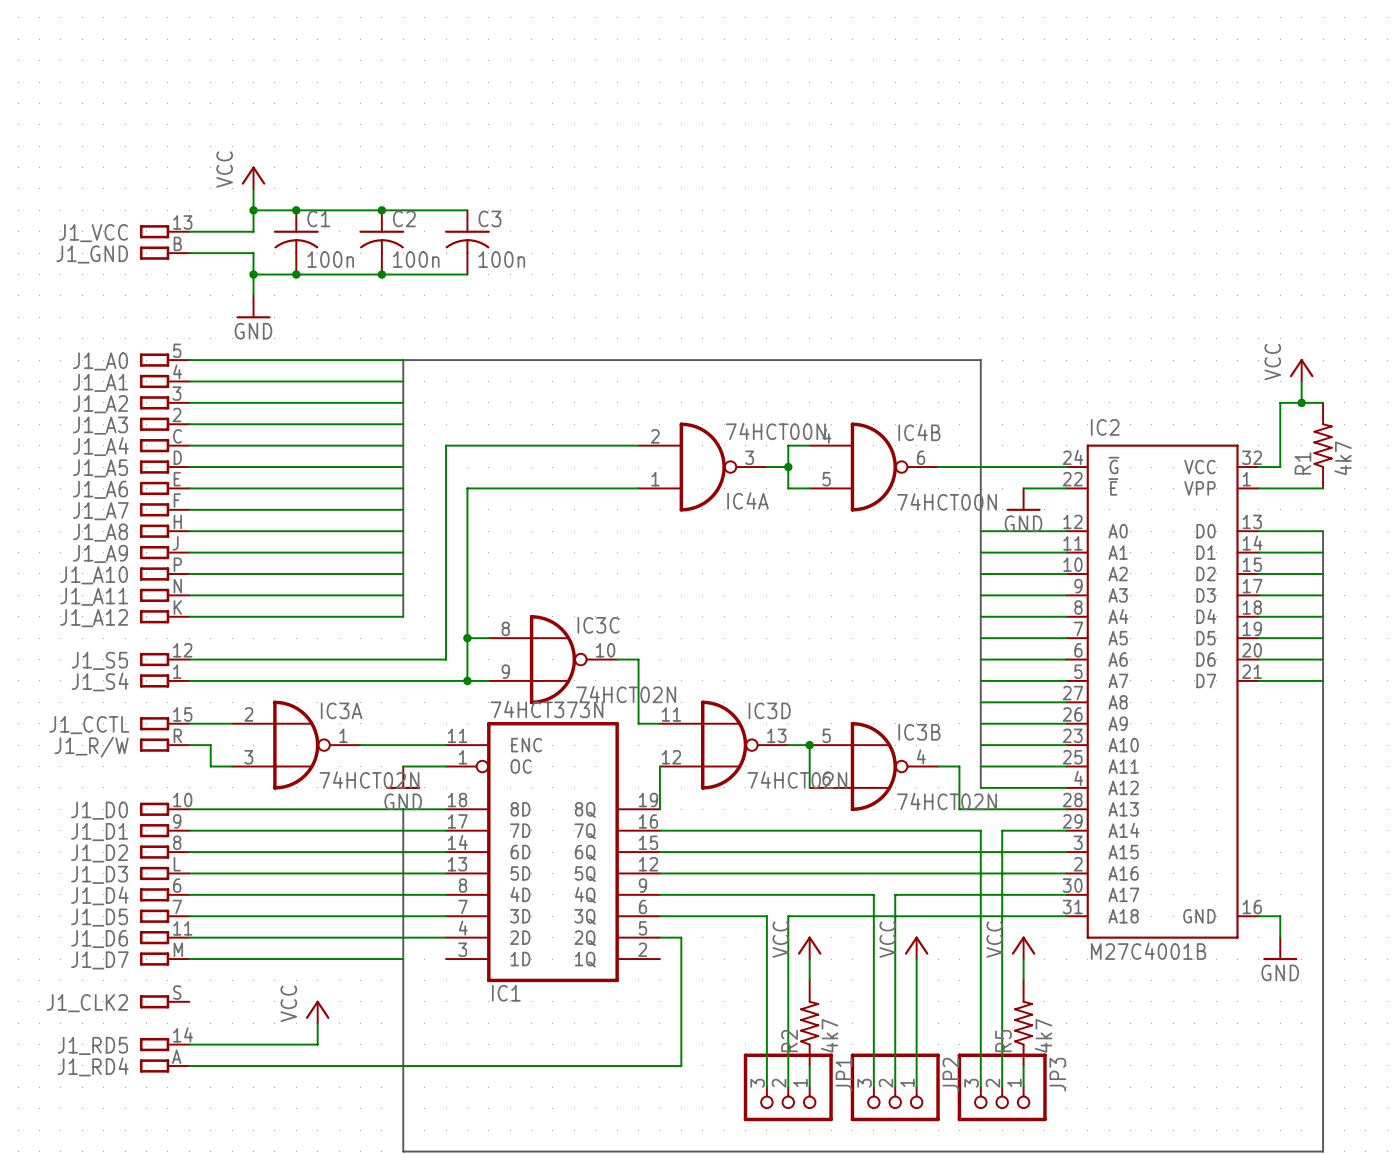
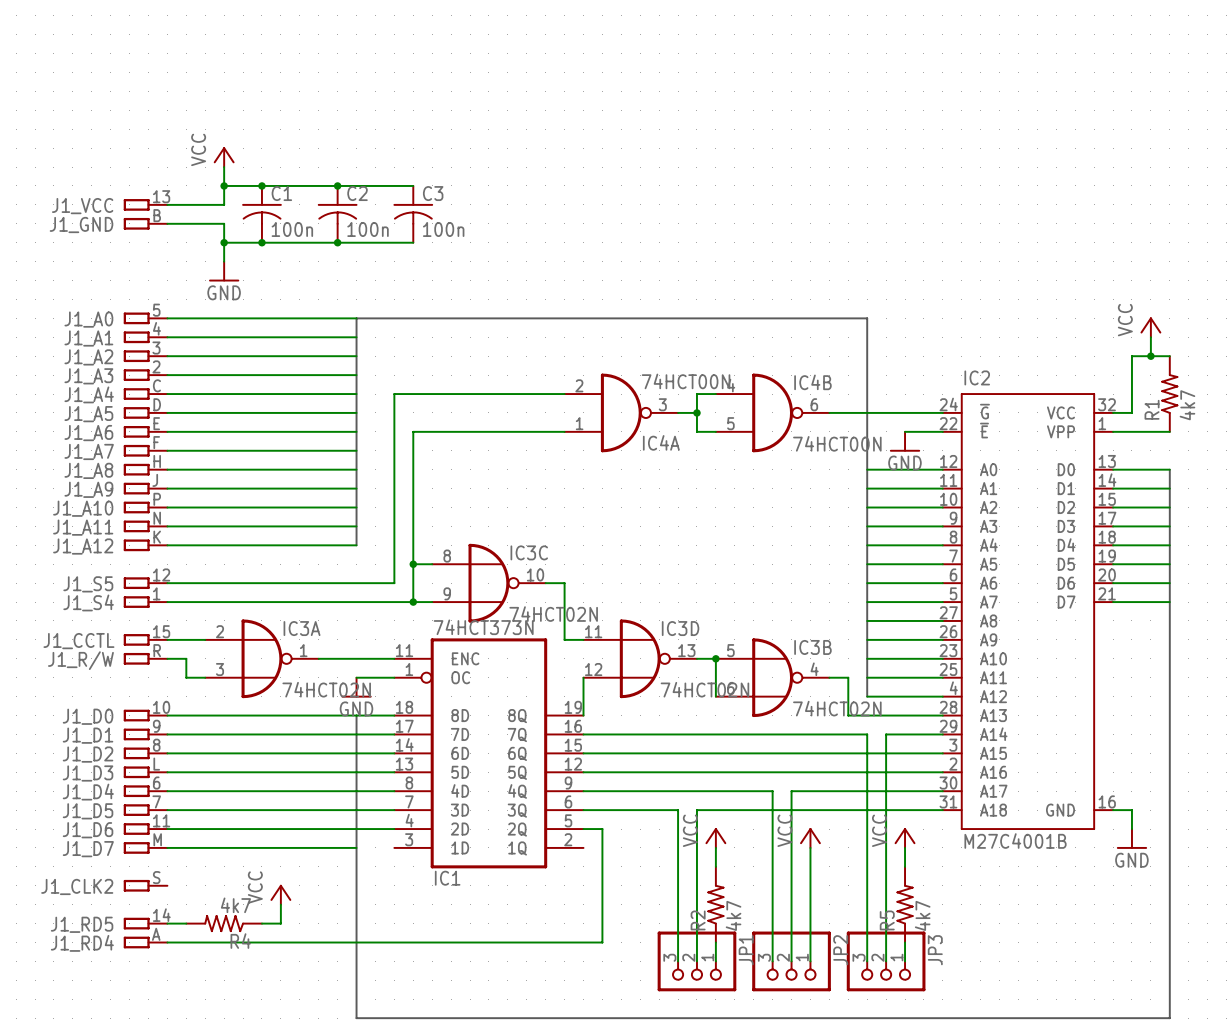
R4: none -> 4k7 (224, 923)

